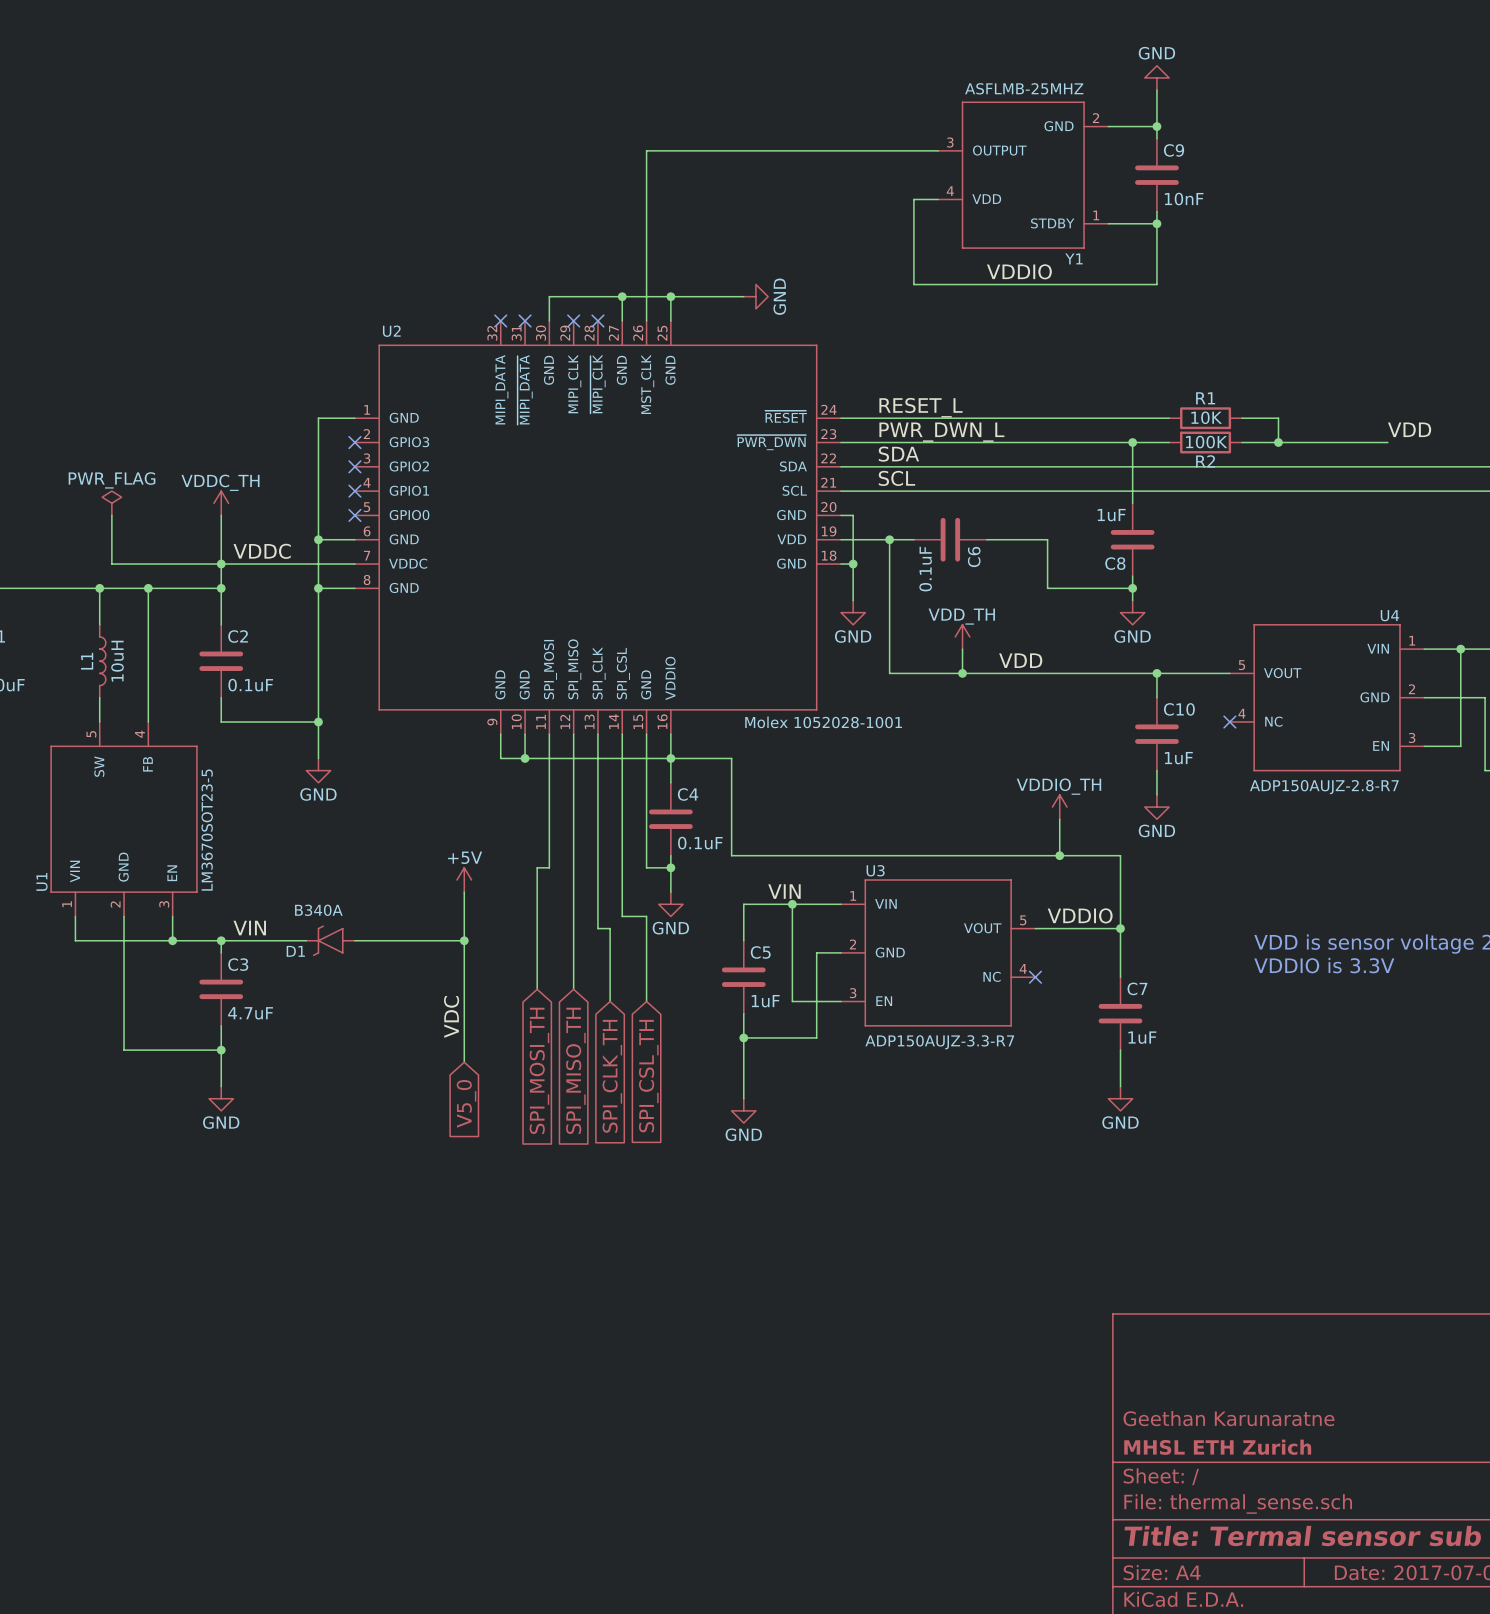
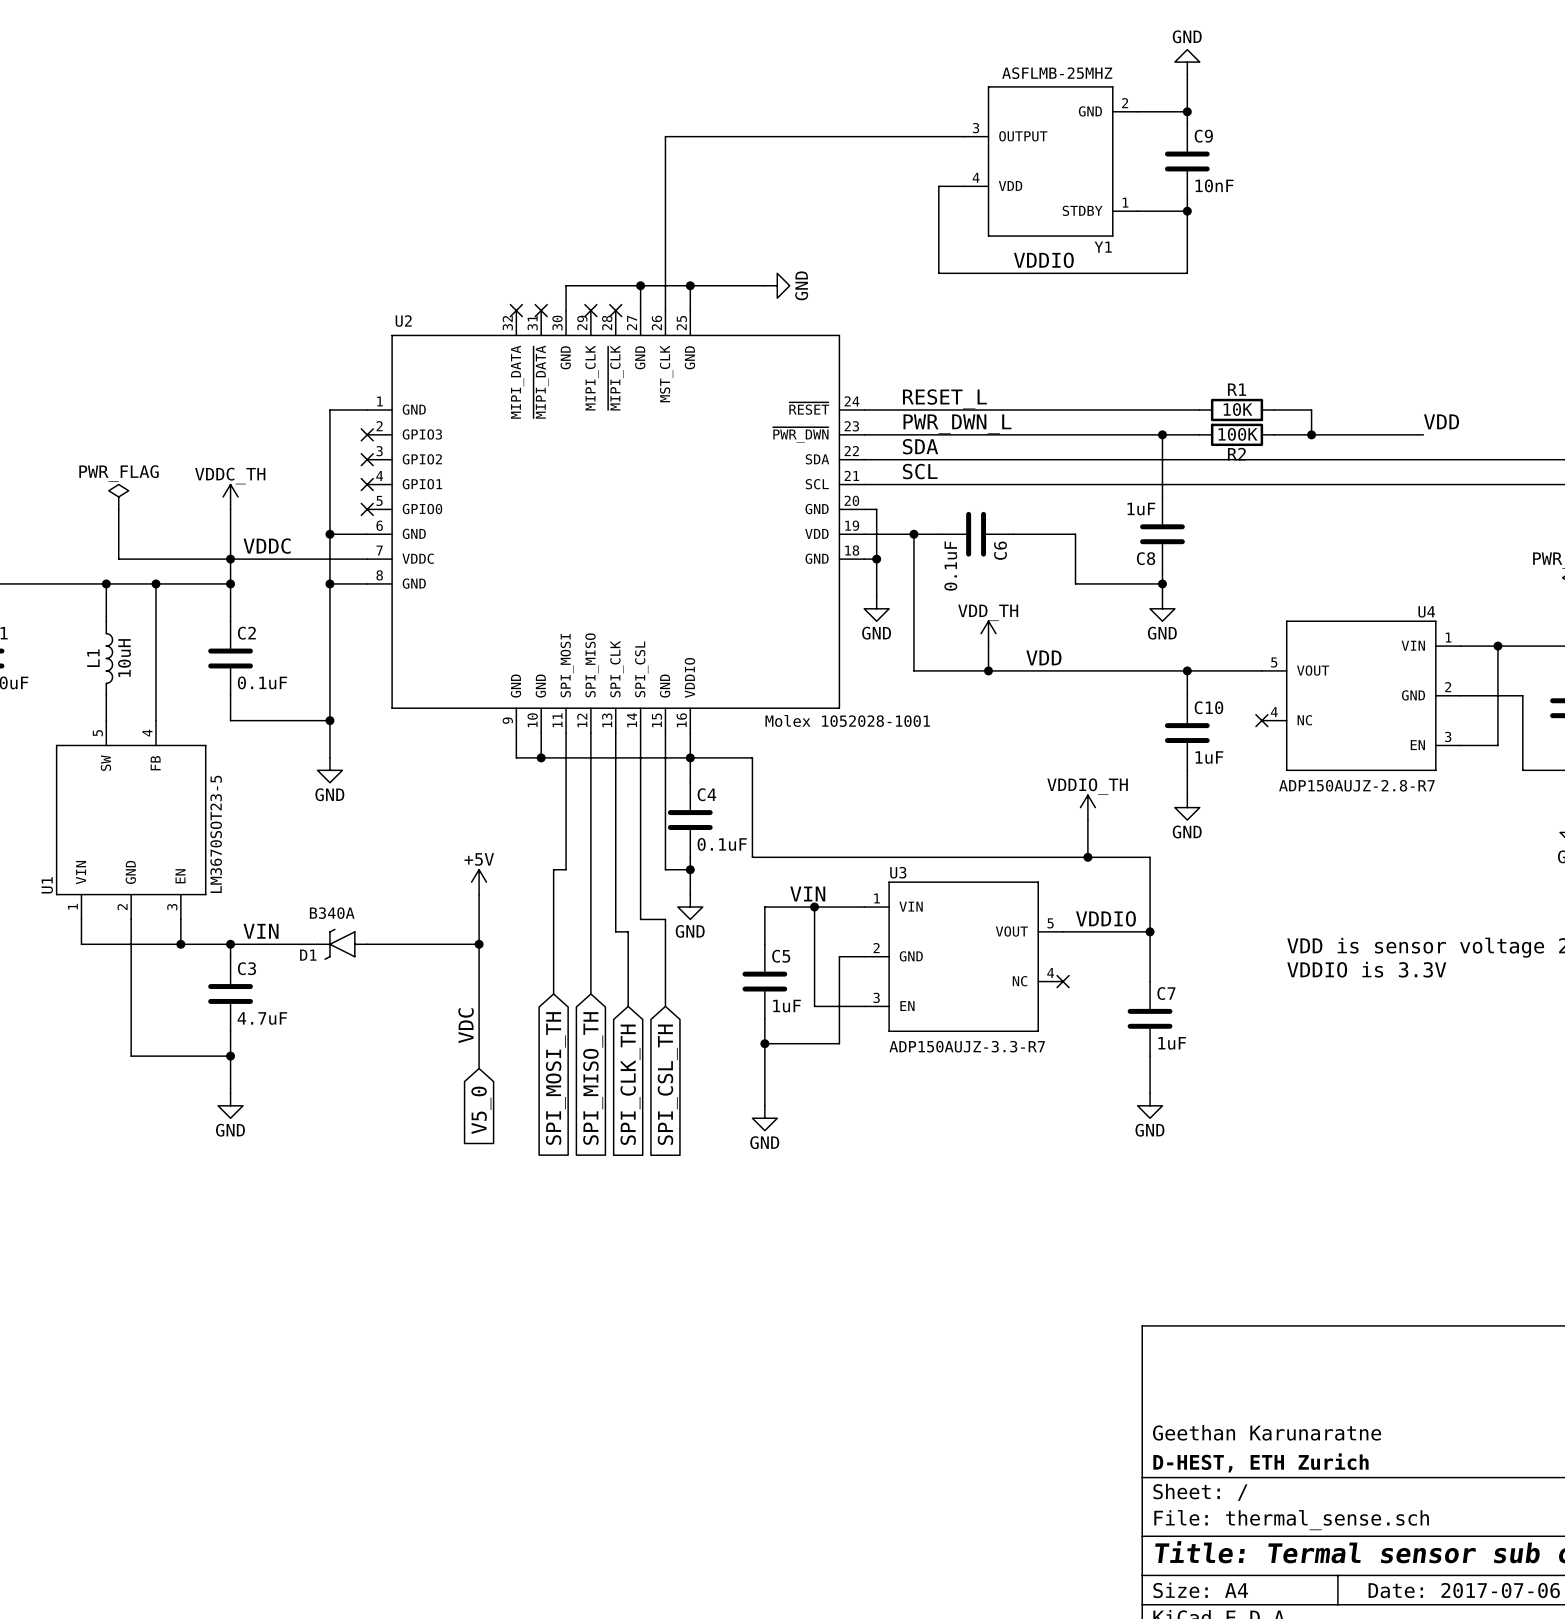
title block: MHSL ETH Zurich (1217, 1447) -> D-HEST, ETH Zurich (1260, 1462)

